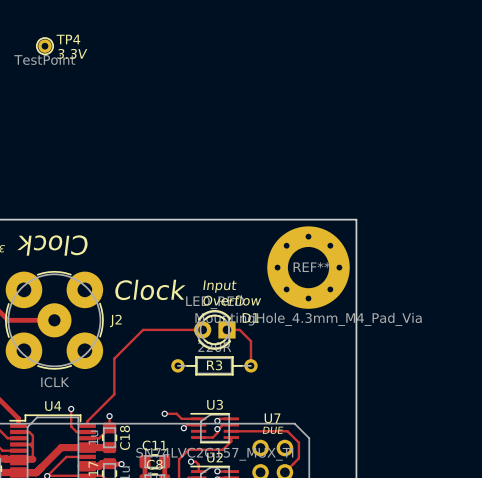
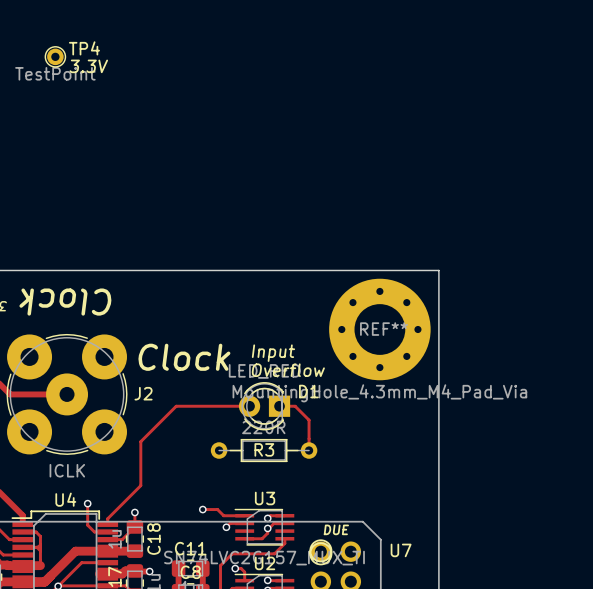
U7 name position: U7 (272, 418) -> U7 (401, 550)
track: (231, 431) (287, 431) (298, 442) (298, 458) (284, 472) -> none
drawing: none -> [309, 539, 333, 566]

